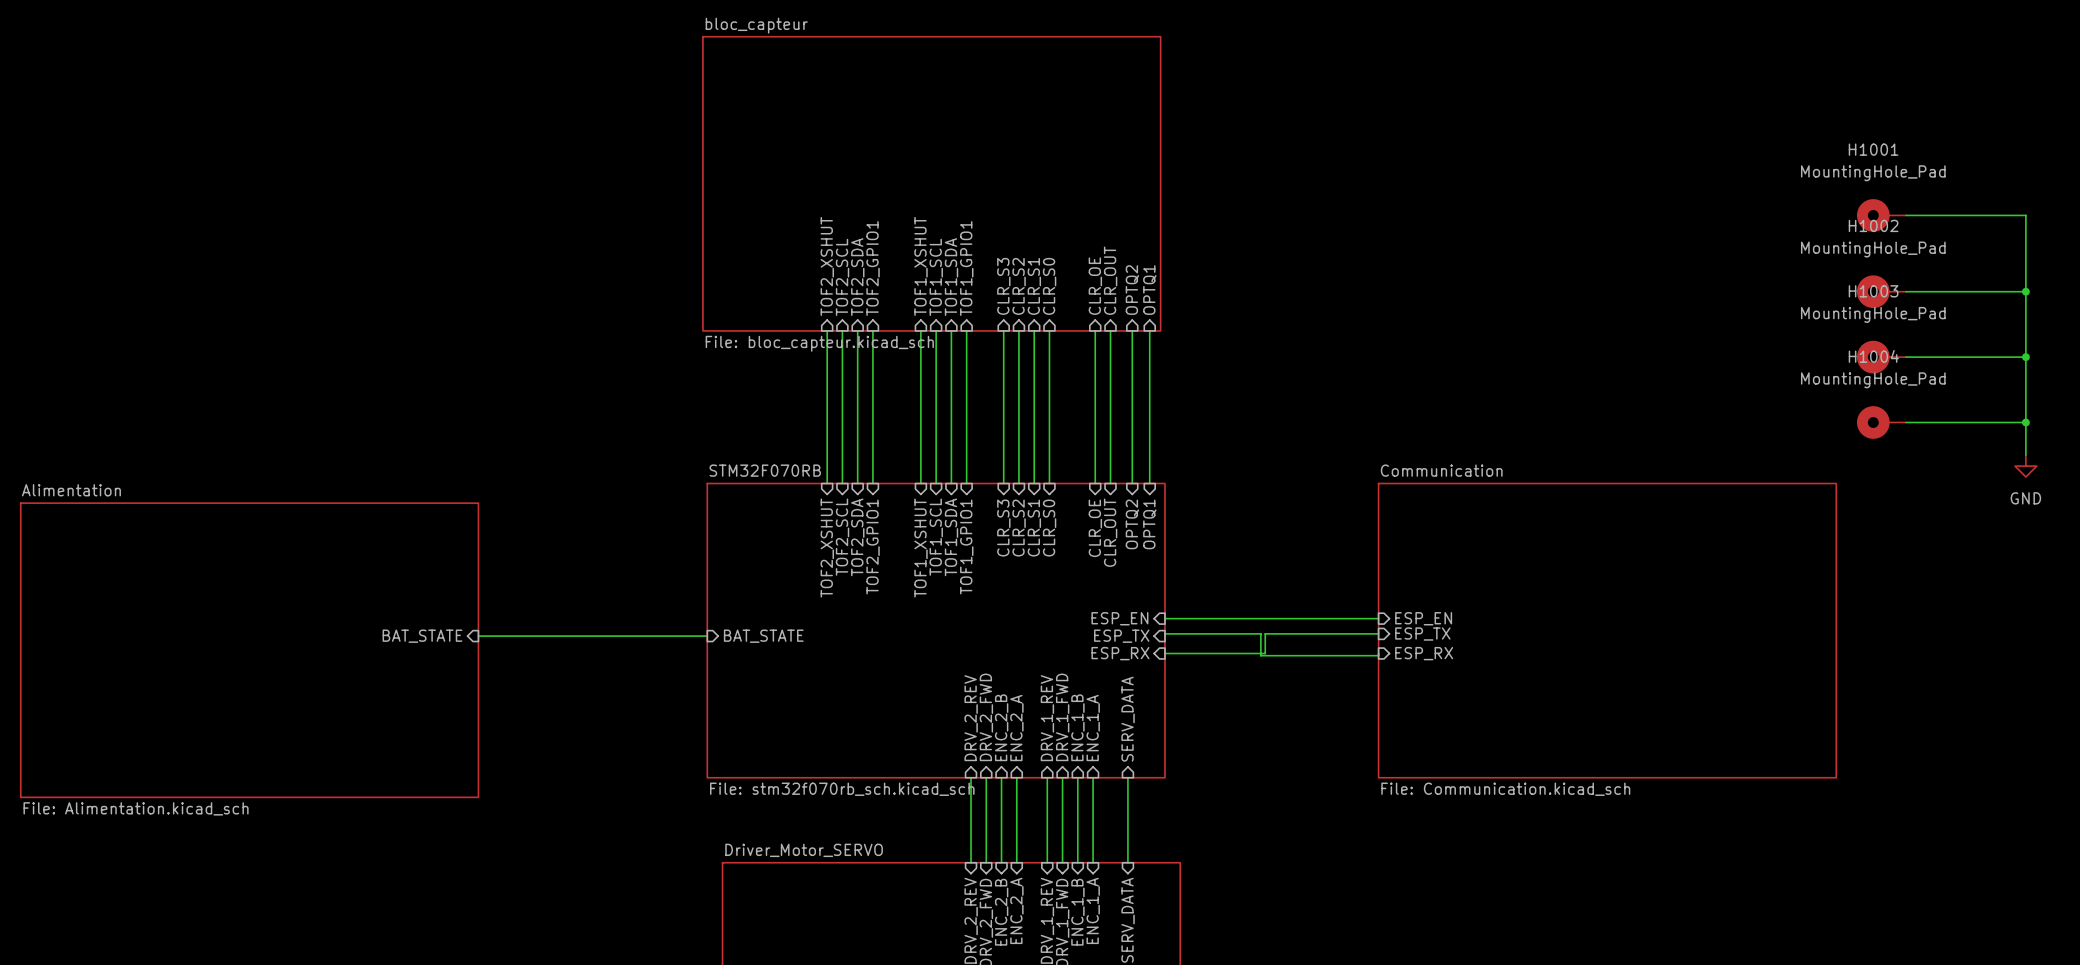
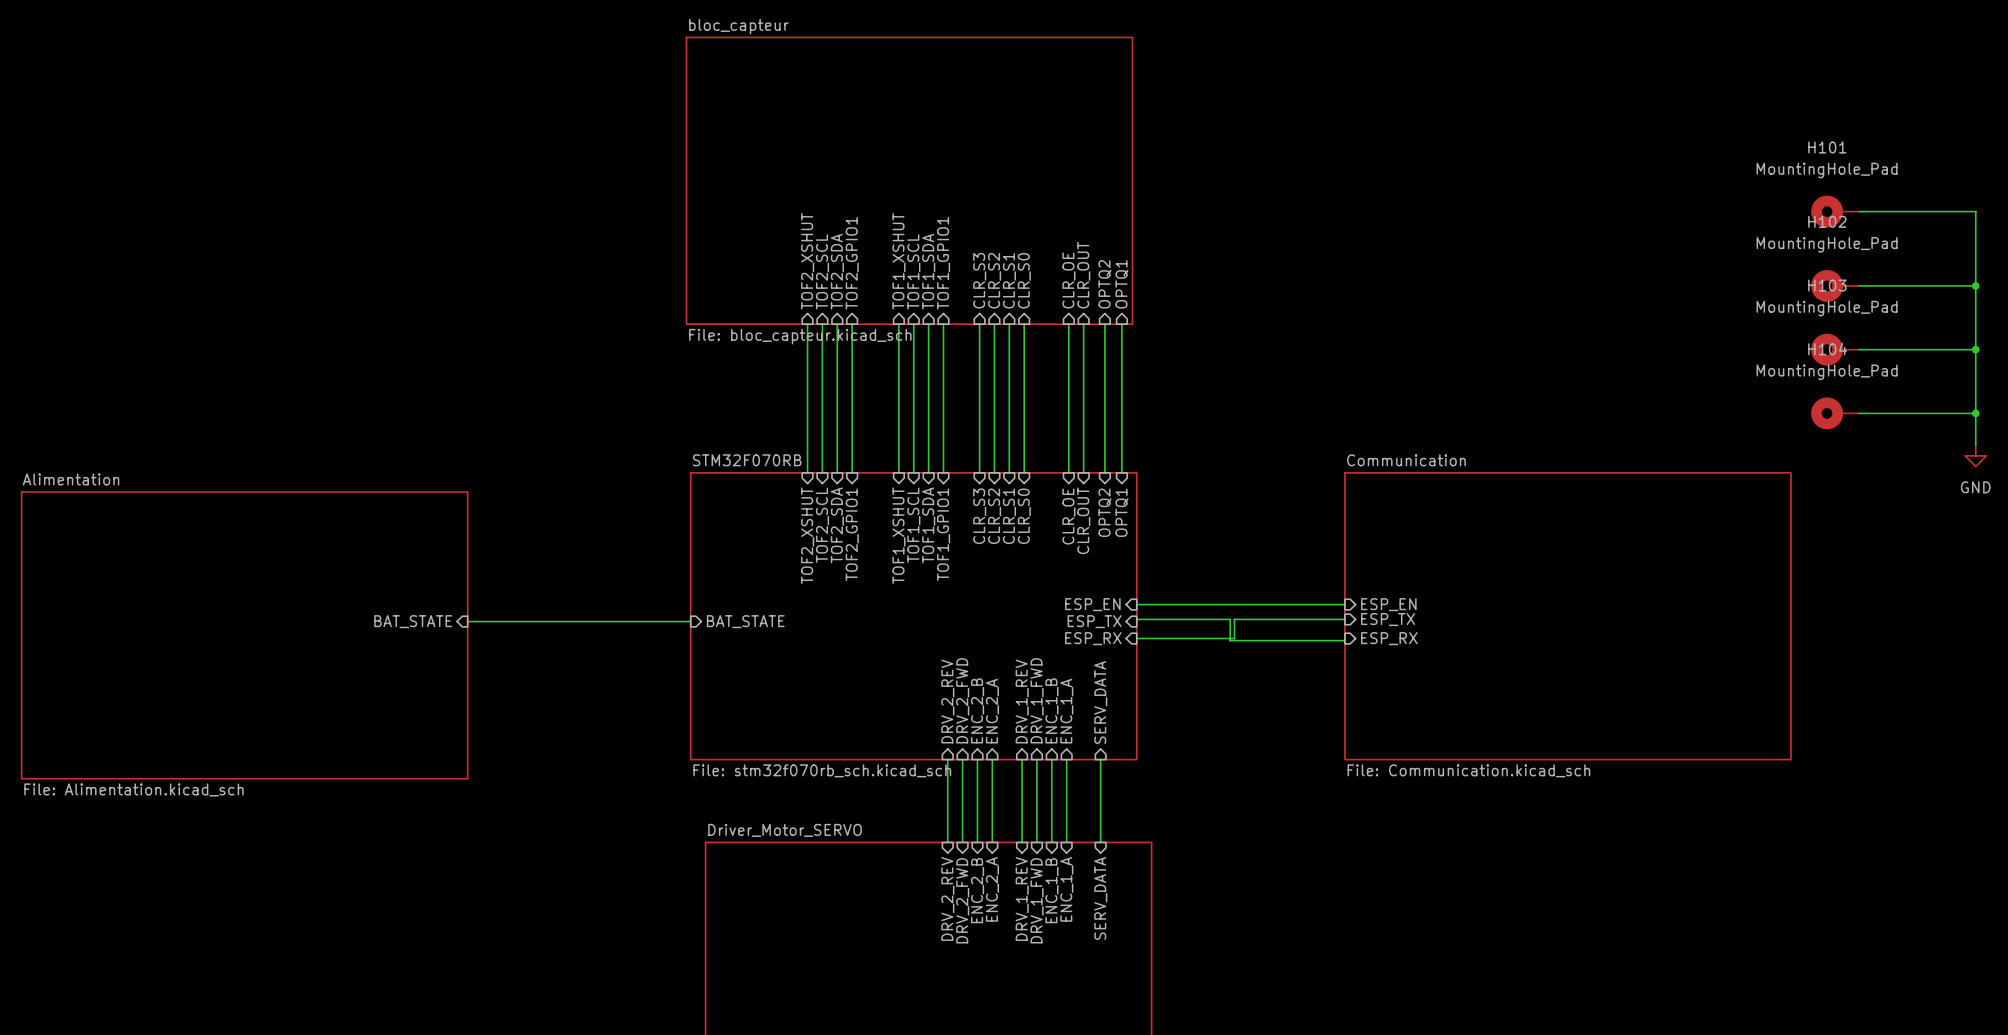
H1001 name: H1001 (1873, 149) -> H101 (1827, 147)
H1002 name: H1002 (1873, 225) -> H102 (1827, 221)
H1003 name: H1003 (1873, 291) -> H103 (1827, 285)
H1004 name: H1004 (1873, 356) -> H104 (1827, 349)

